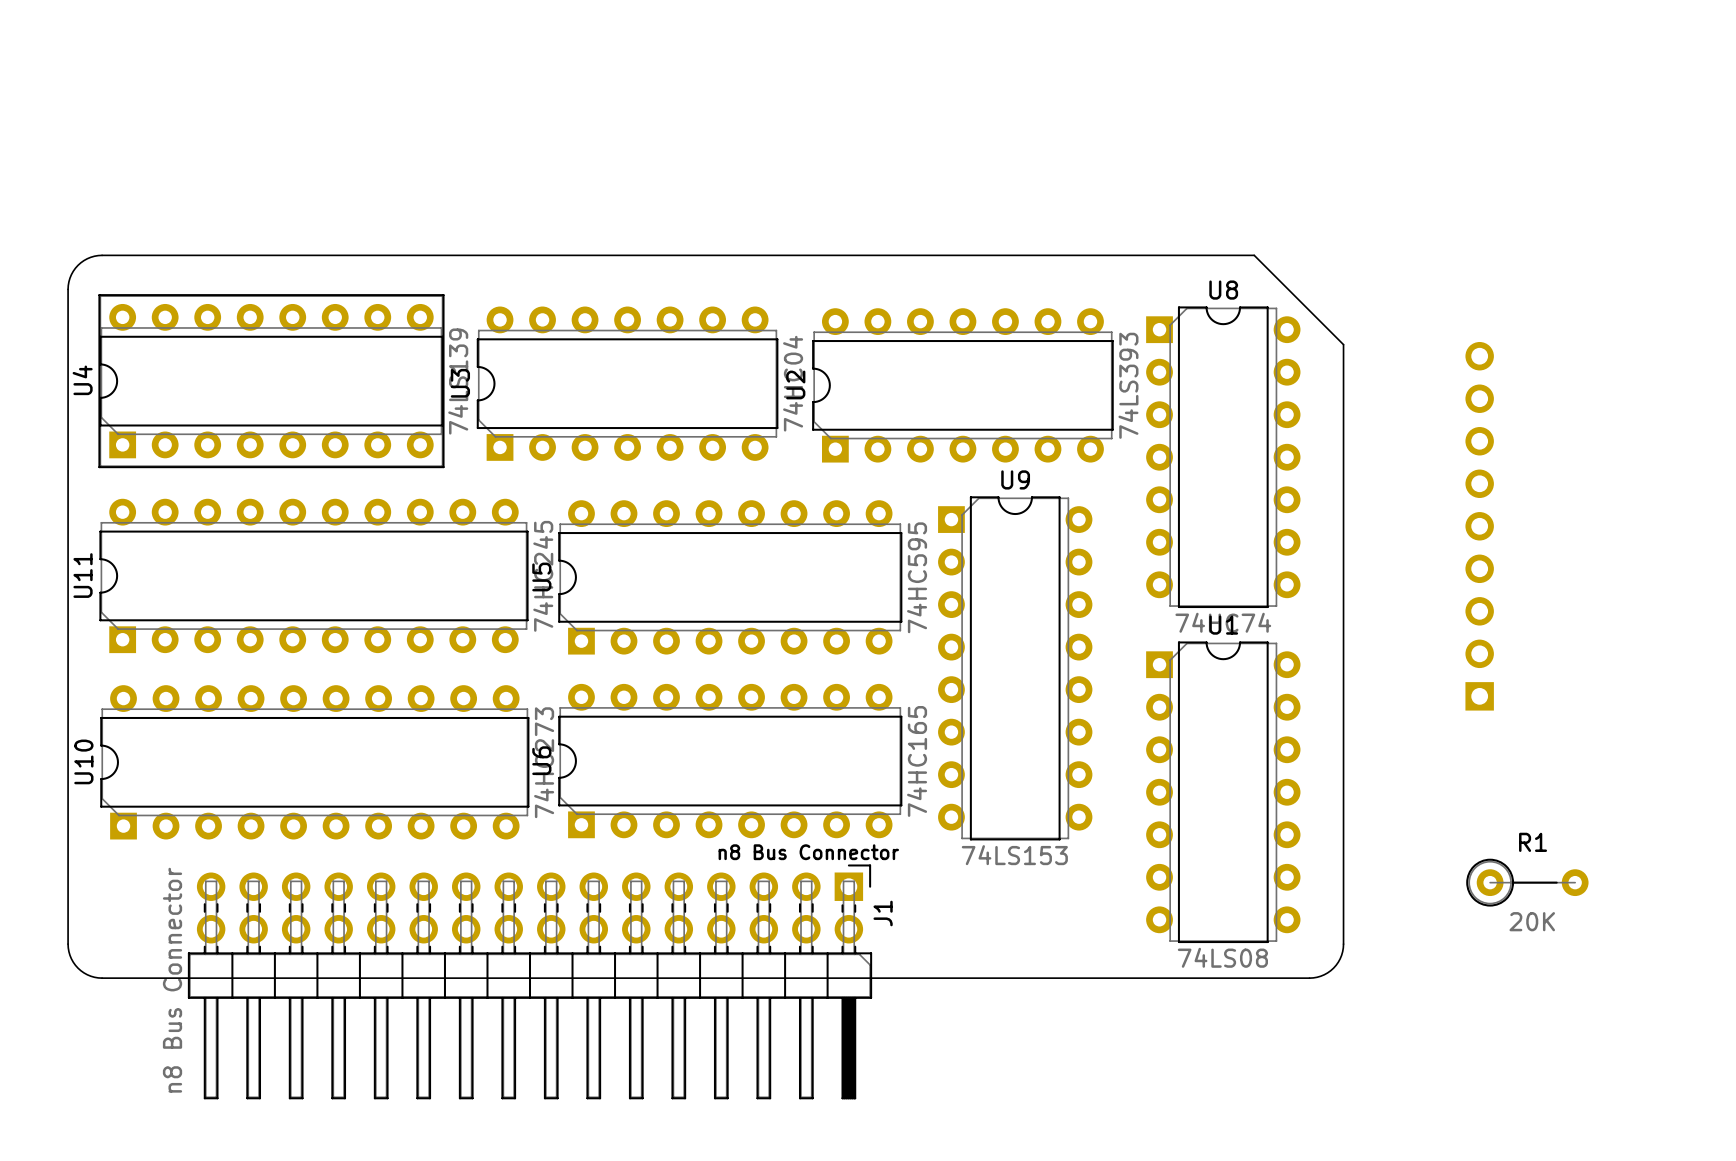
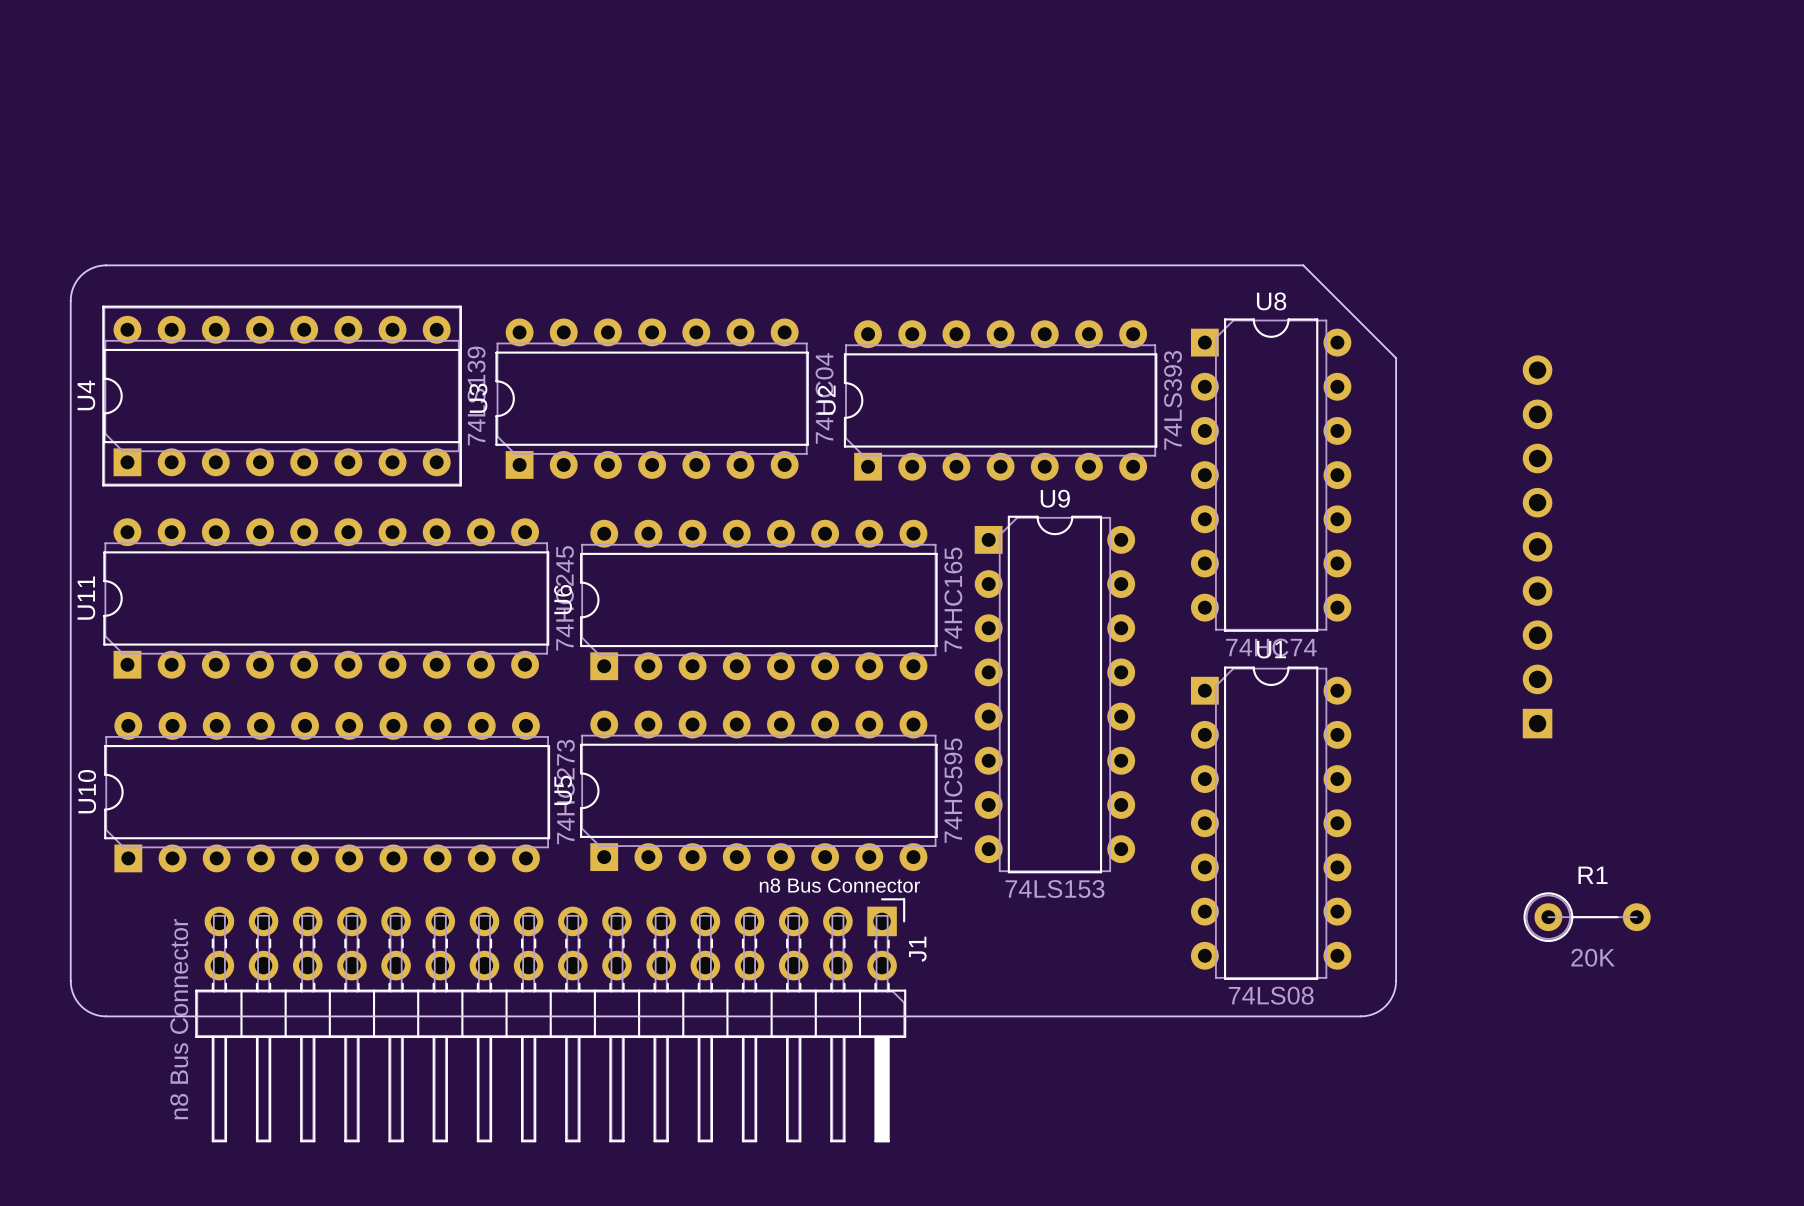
U5 name: U5 (541, 576) -> U6 (563, 599)
U5 value: 74HC595 (917, 577) -> 74HC165 (953, 599)
U6 name: U6 (541, 760) -> U5 (563, 790)
U6 value: 74HC165 (917, 761) -> 74HC595 (953, 790)

